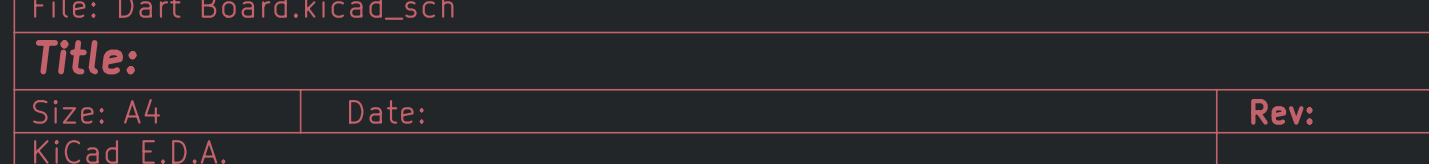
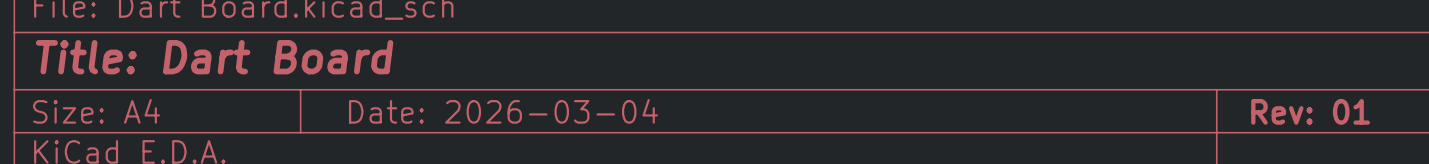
title block: Title: (86, 57) -> Title: Dart Board (214, 57)
title block: Date: (386, 111) -> Date: 2026-03-04 (503, 111)
title block: Rev: (1281, 111) -> Rev: 01 (1310, 111)

